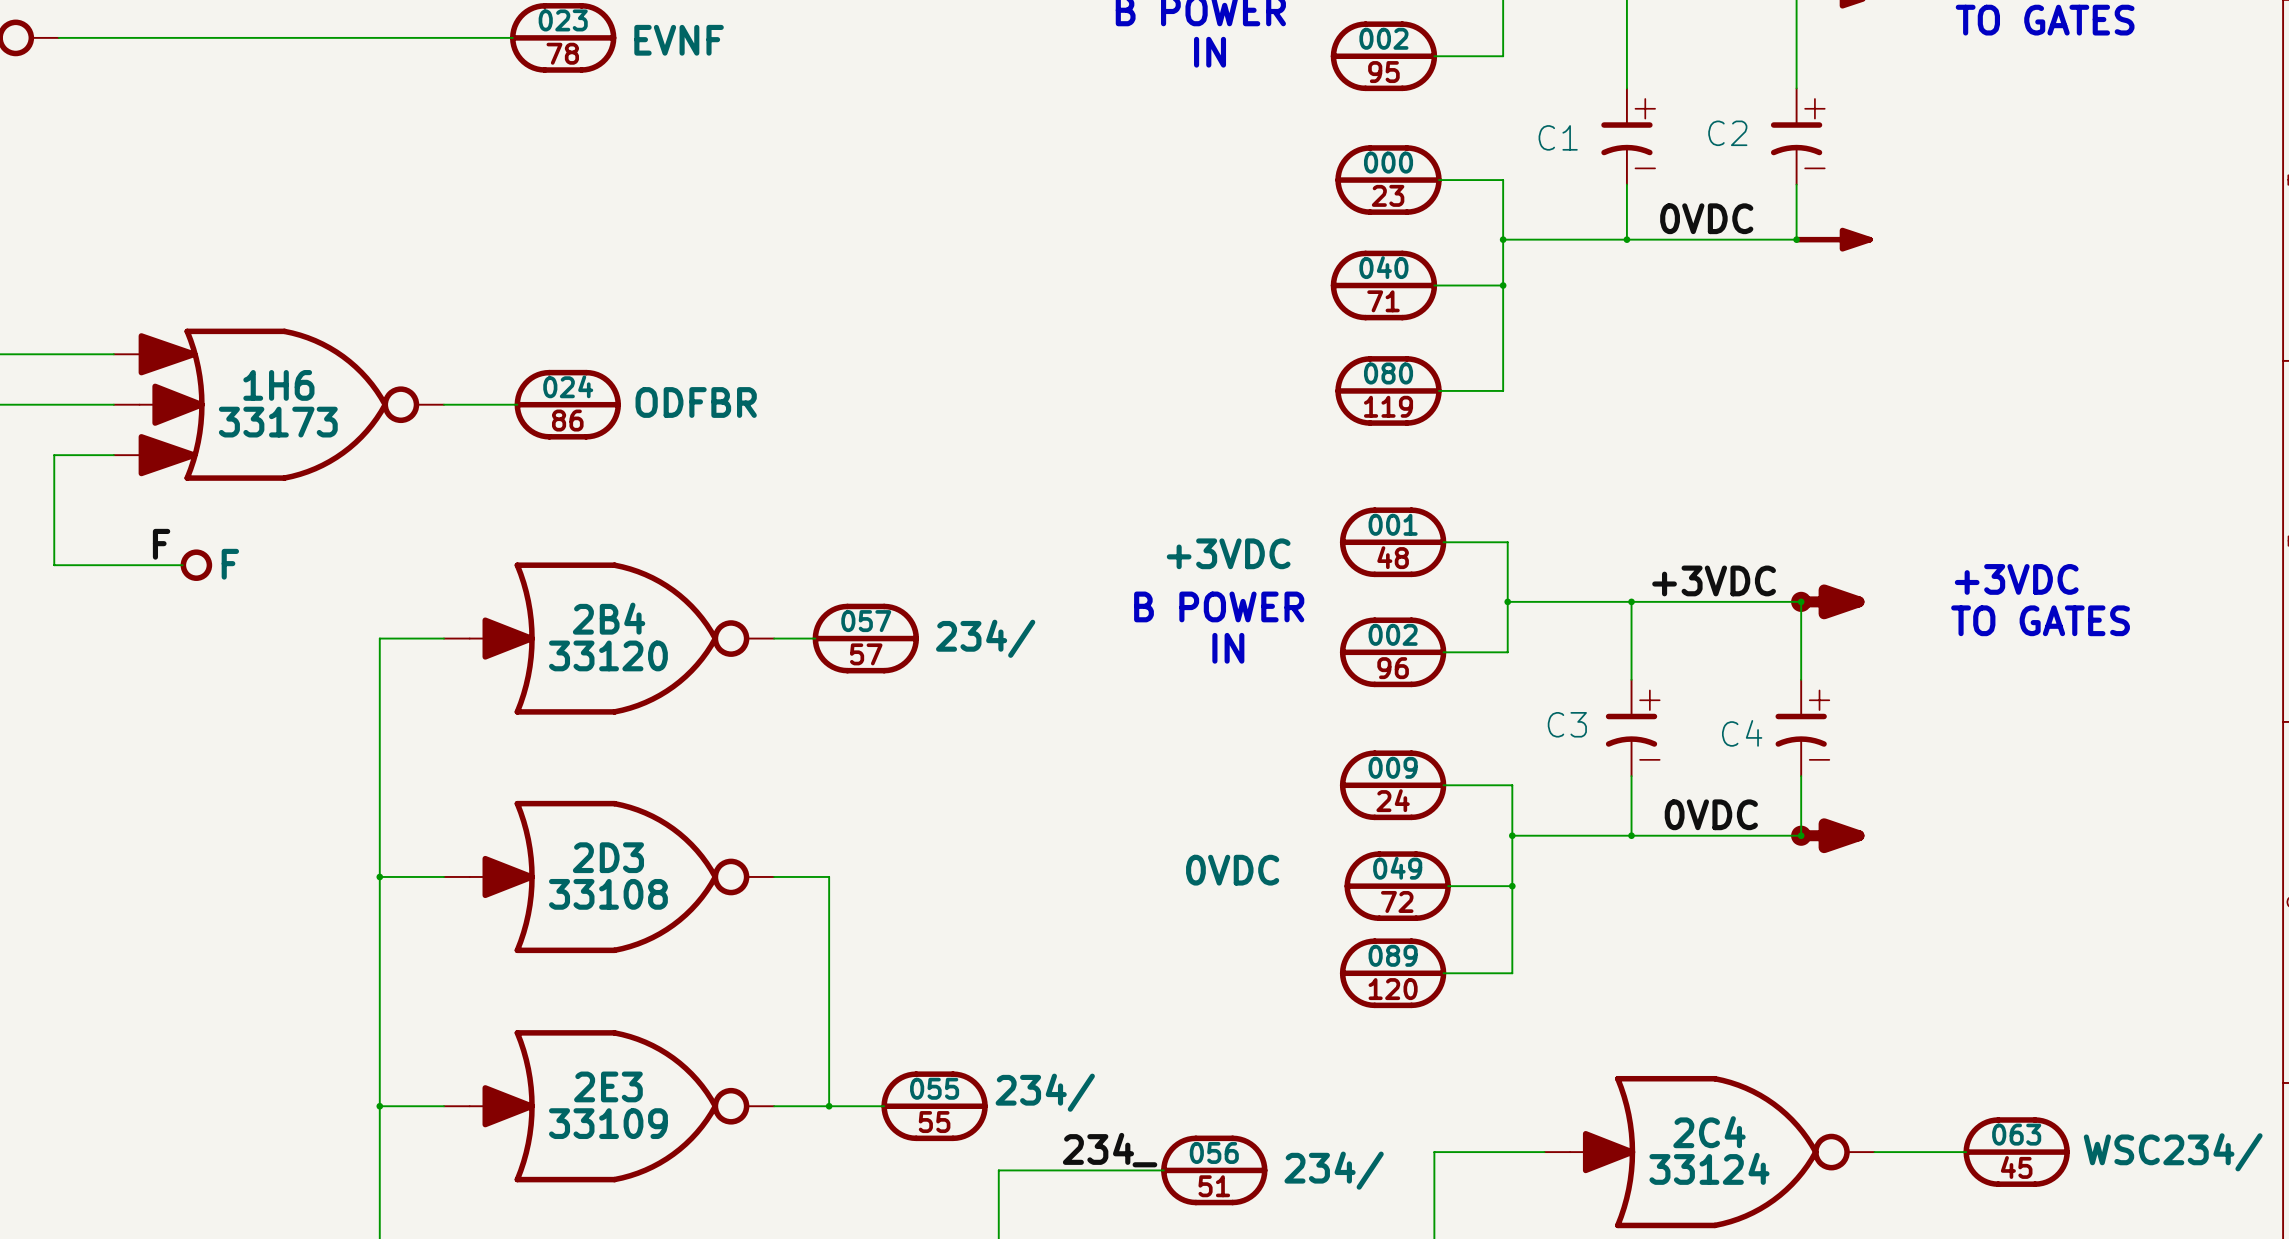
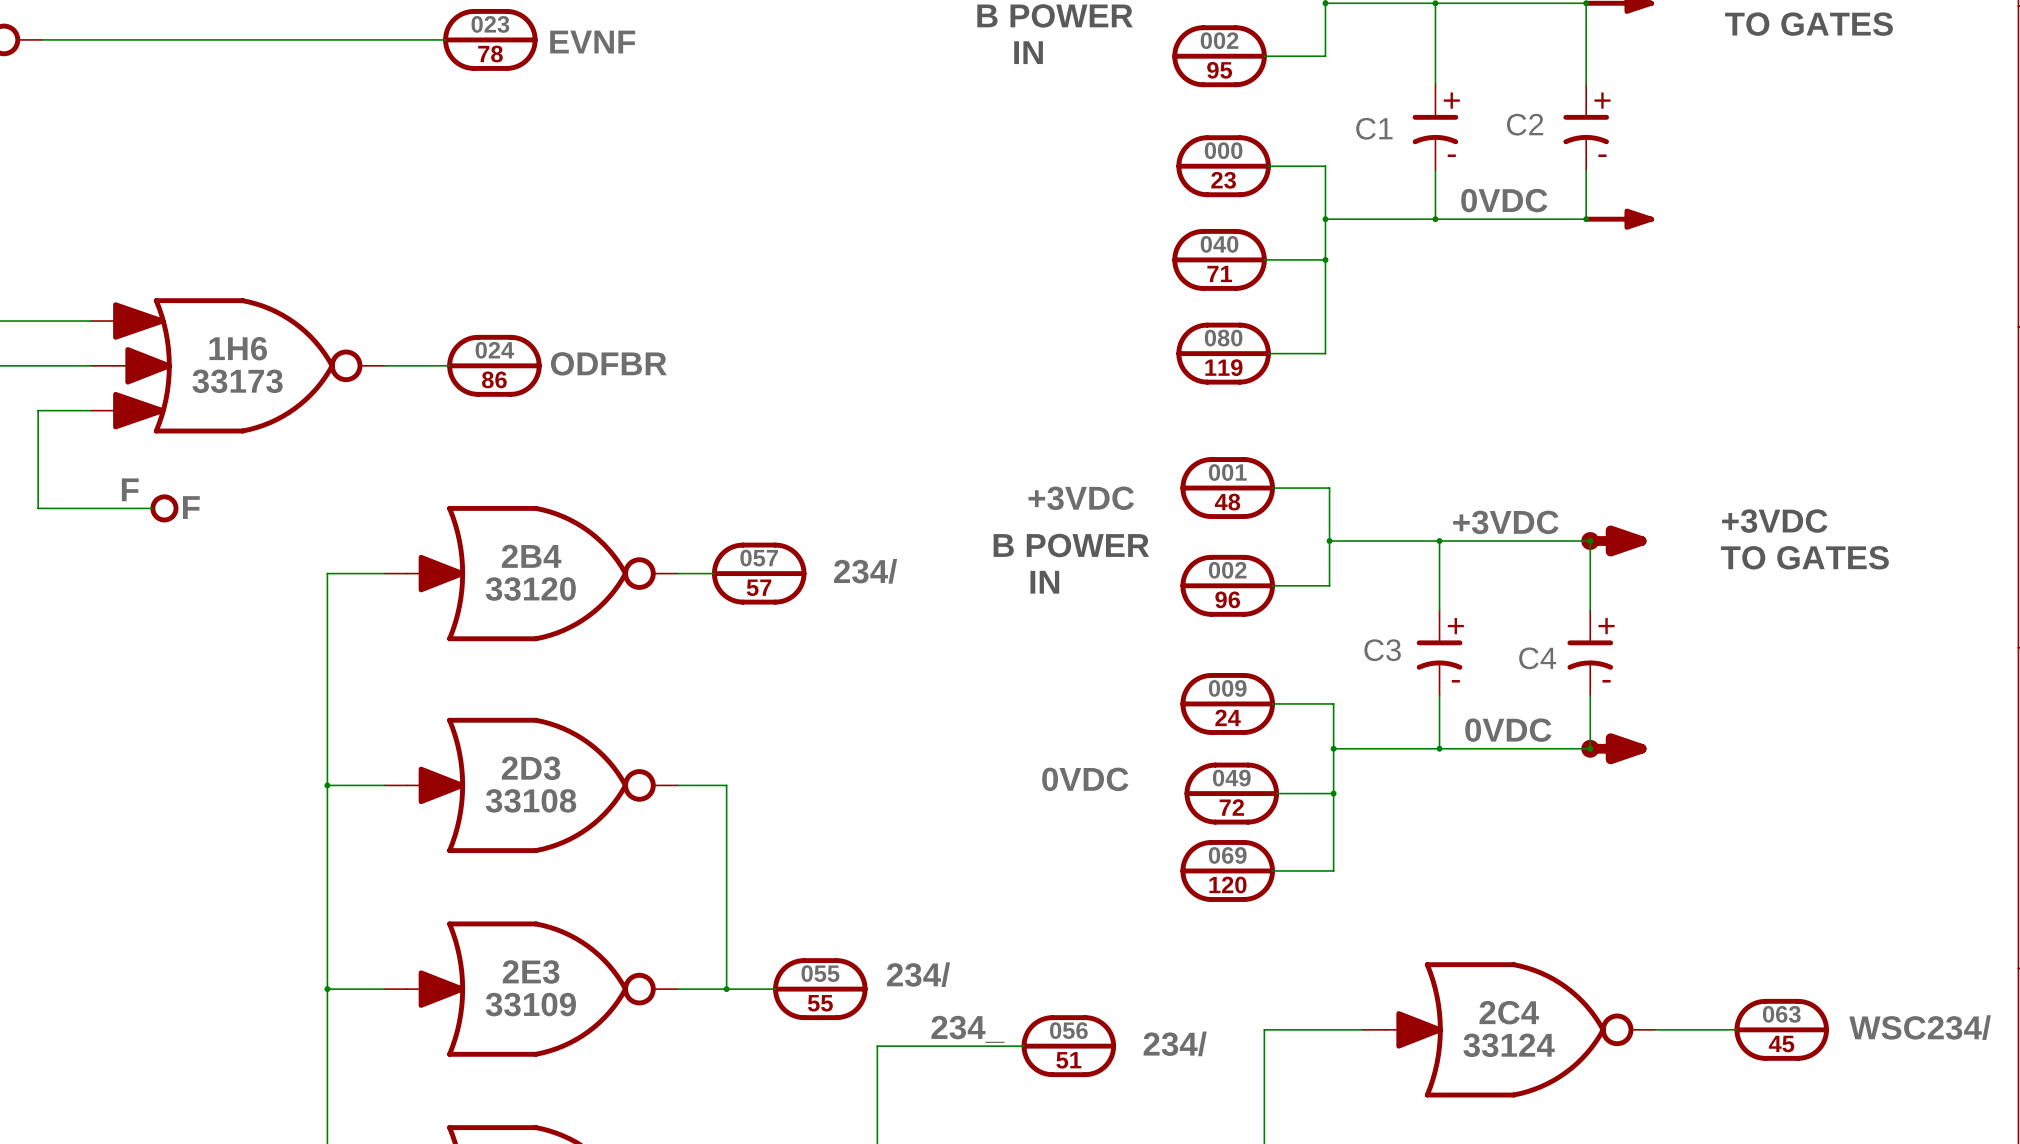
part text: 089 (1393, 955) -> 069 (1227, 855)

